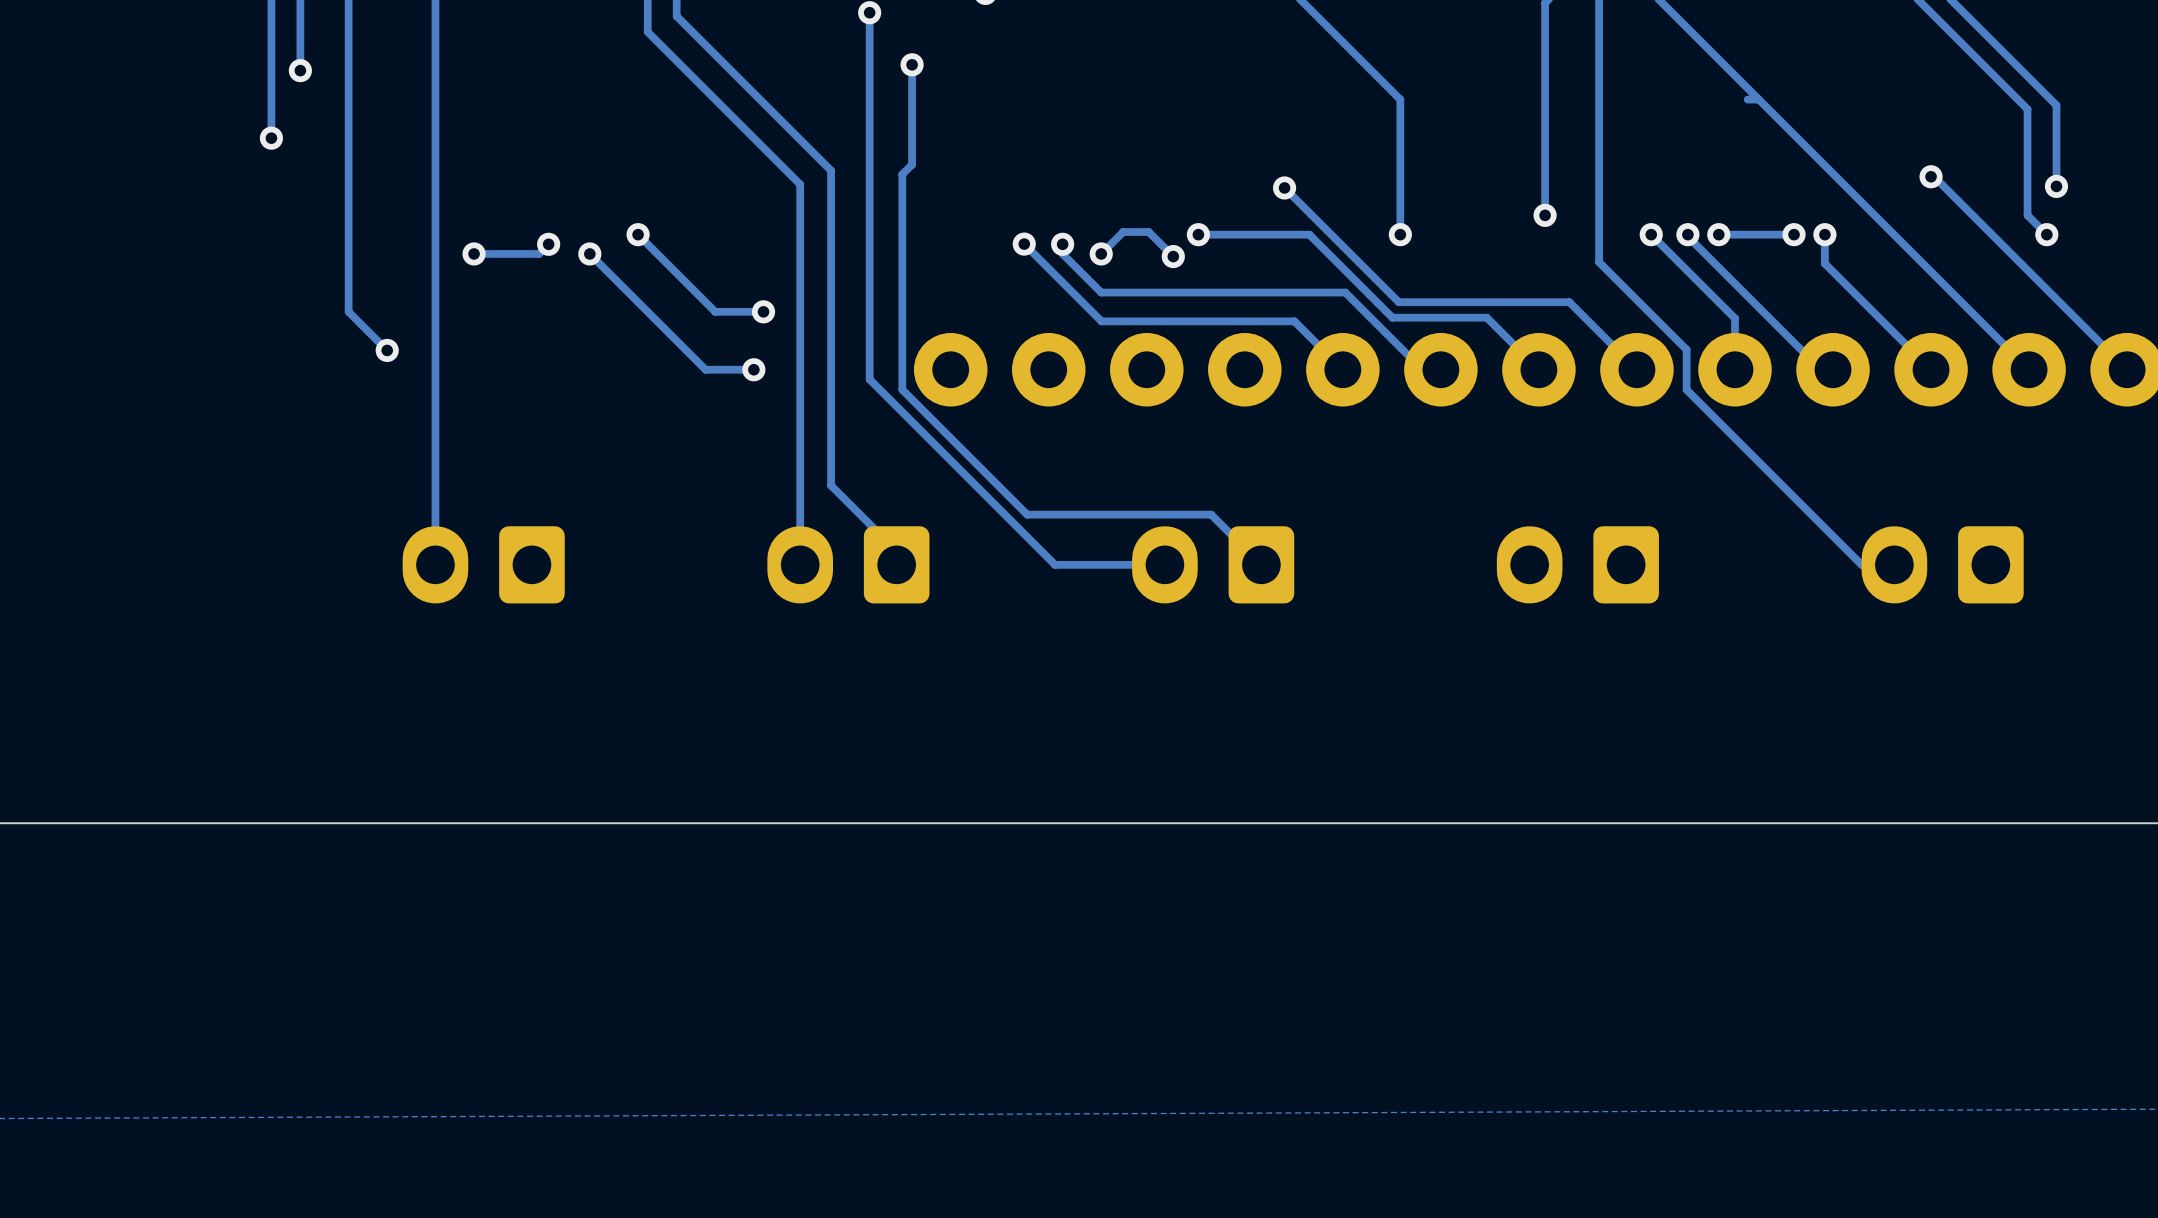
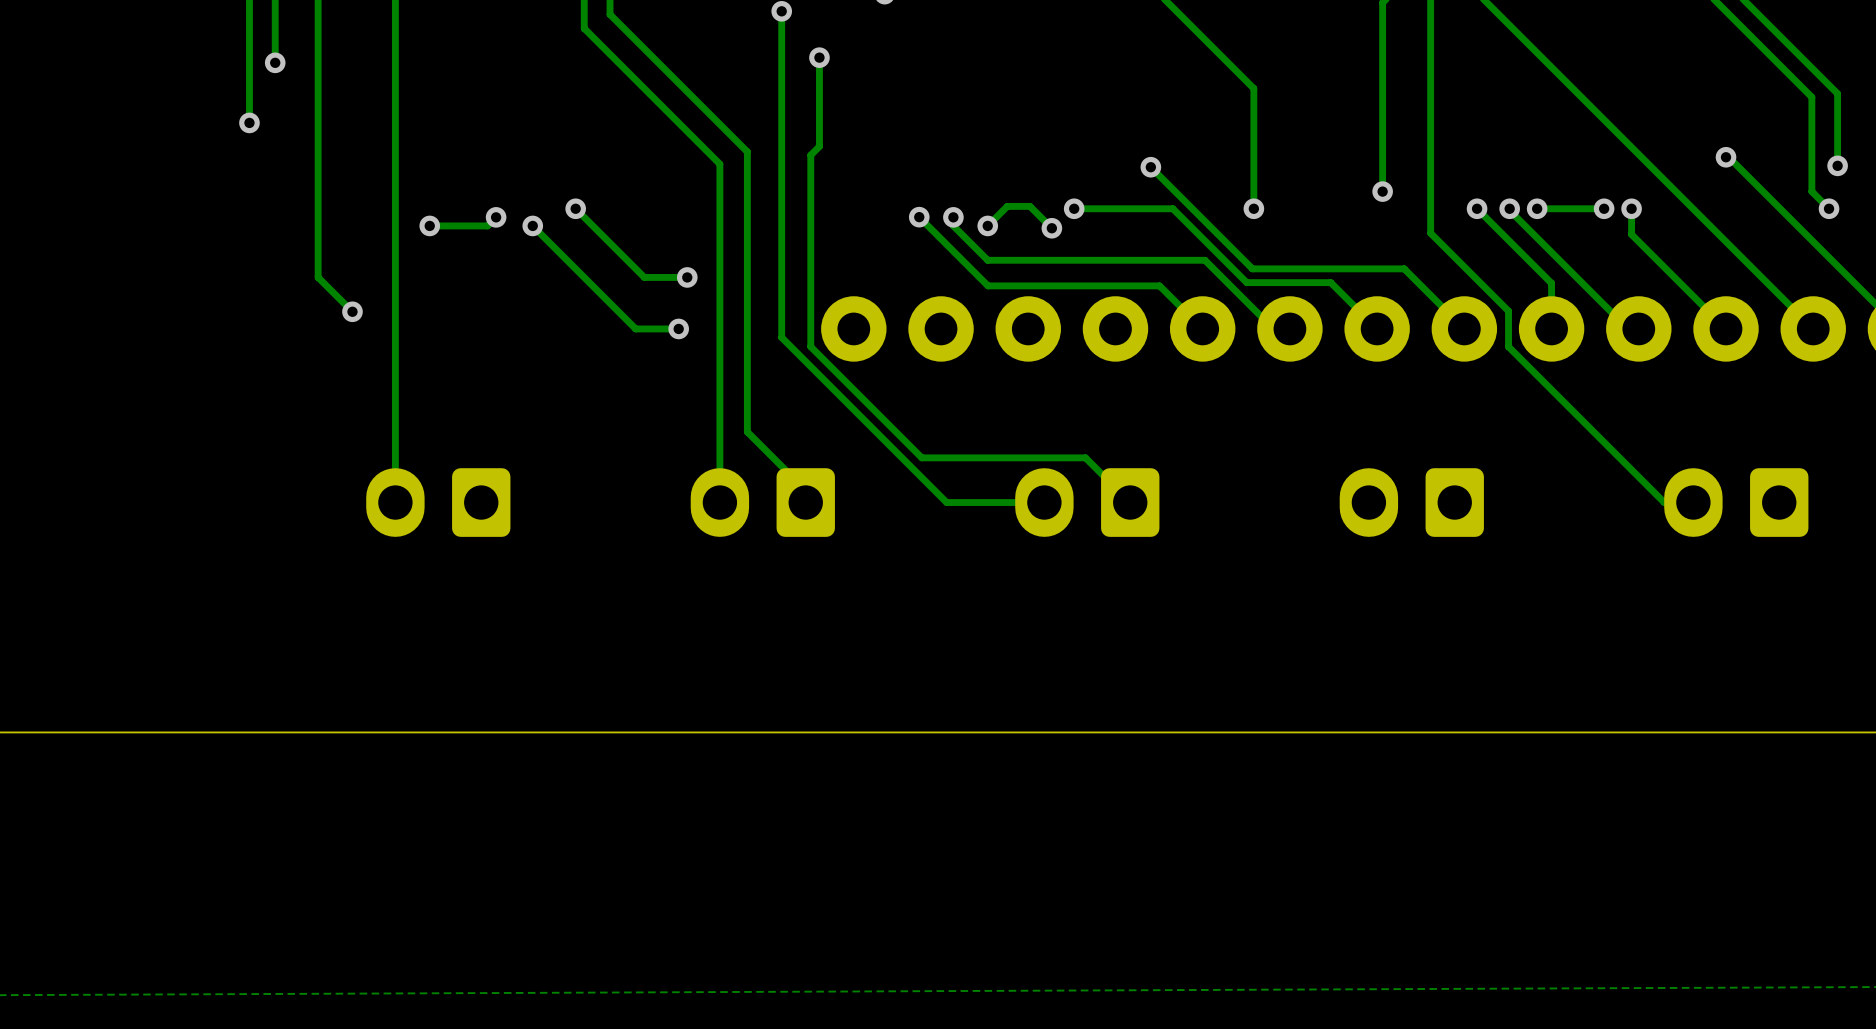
track: (1758, 99) (1747, 99) -> none

